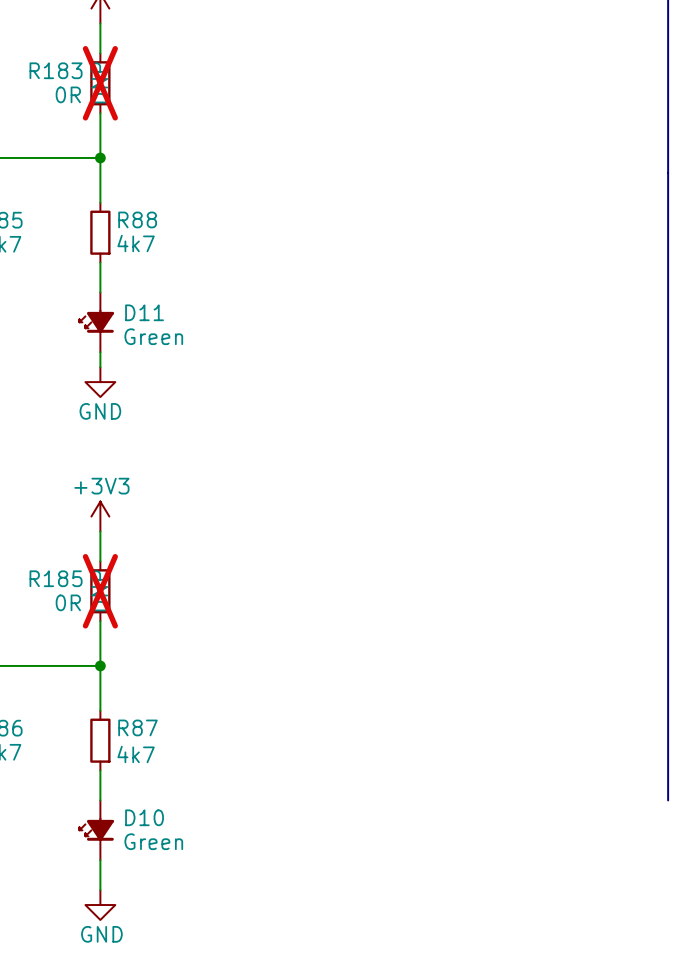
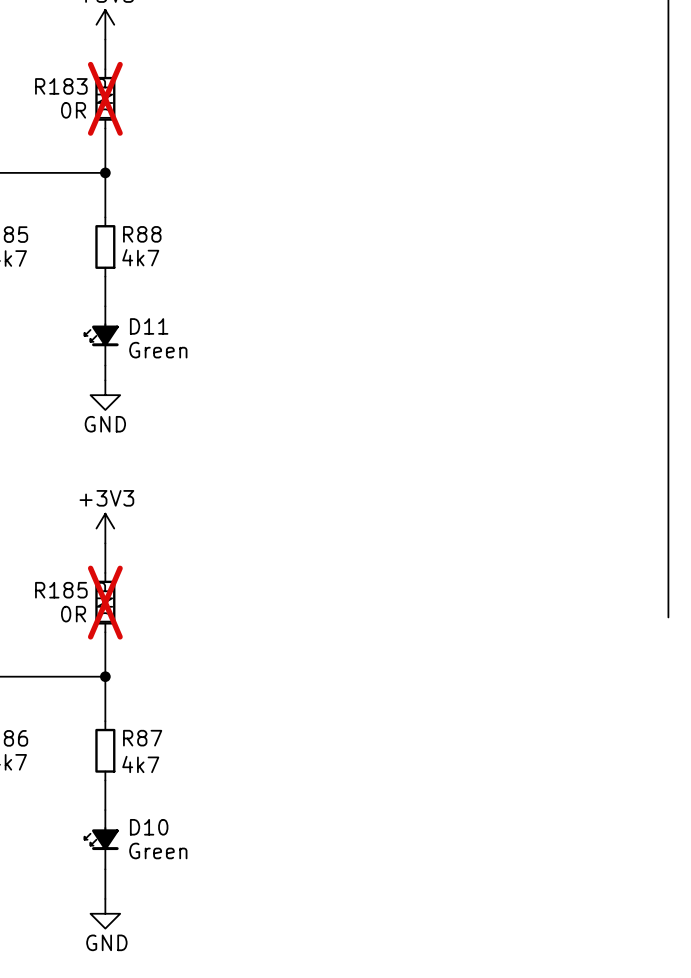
line: (668, 606) (668, 800) -> none

